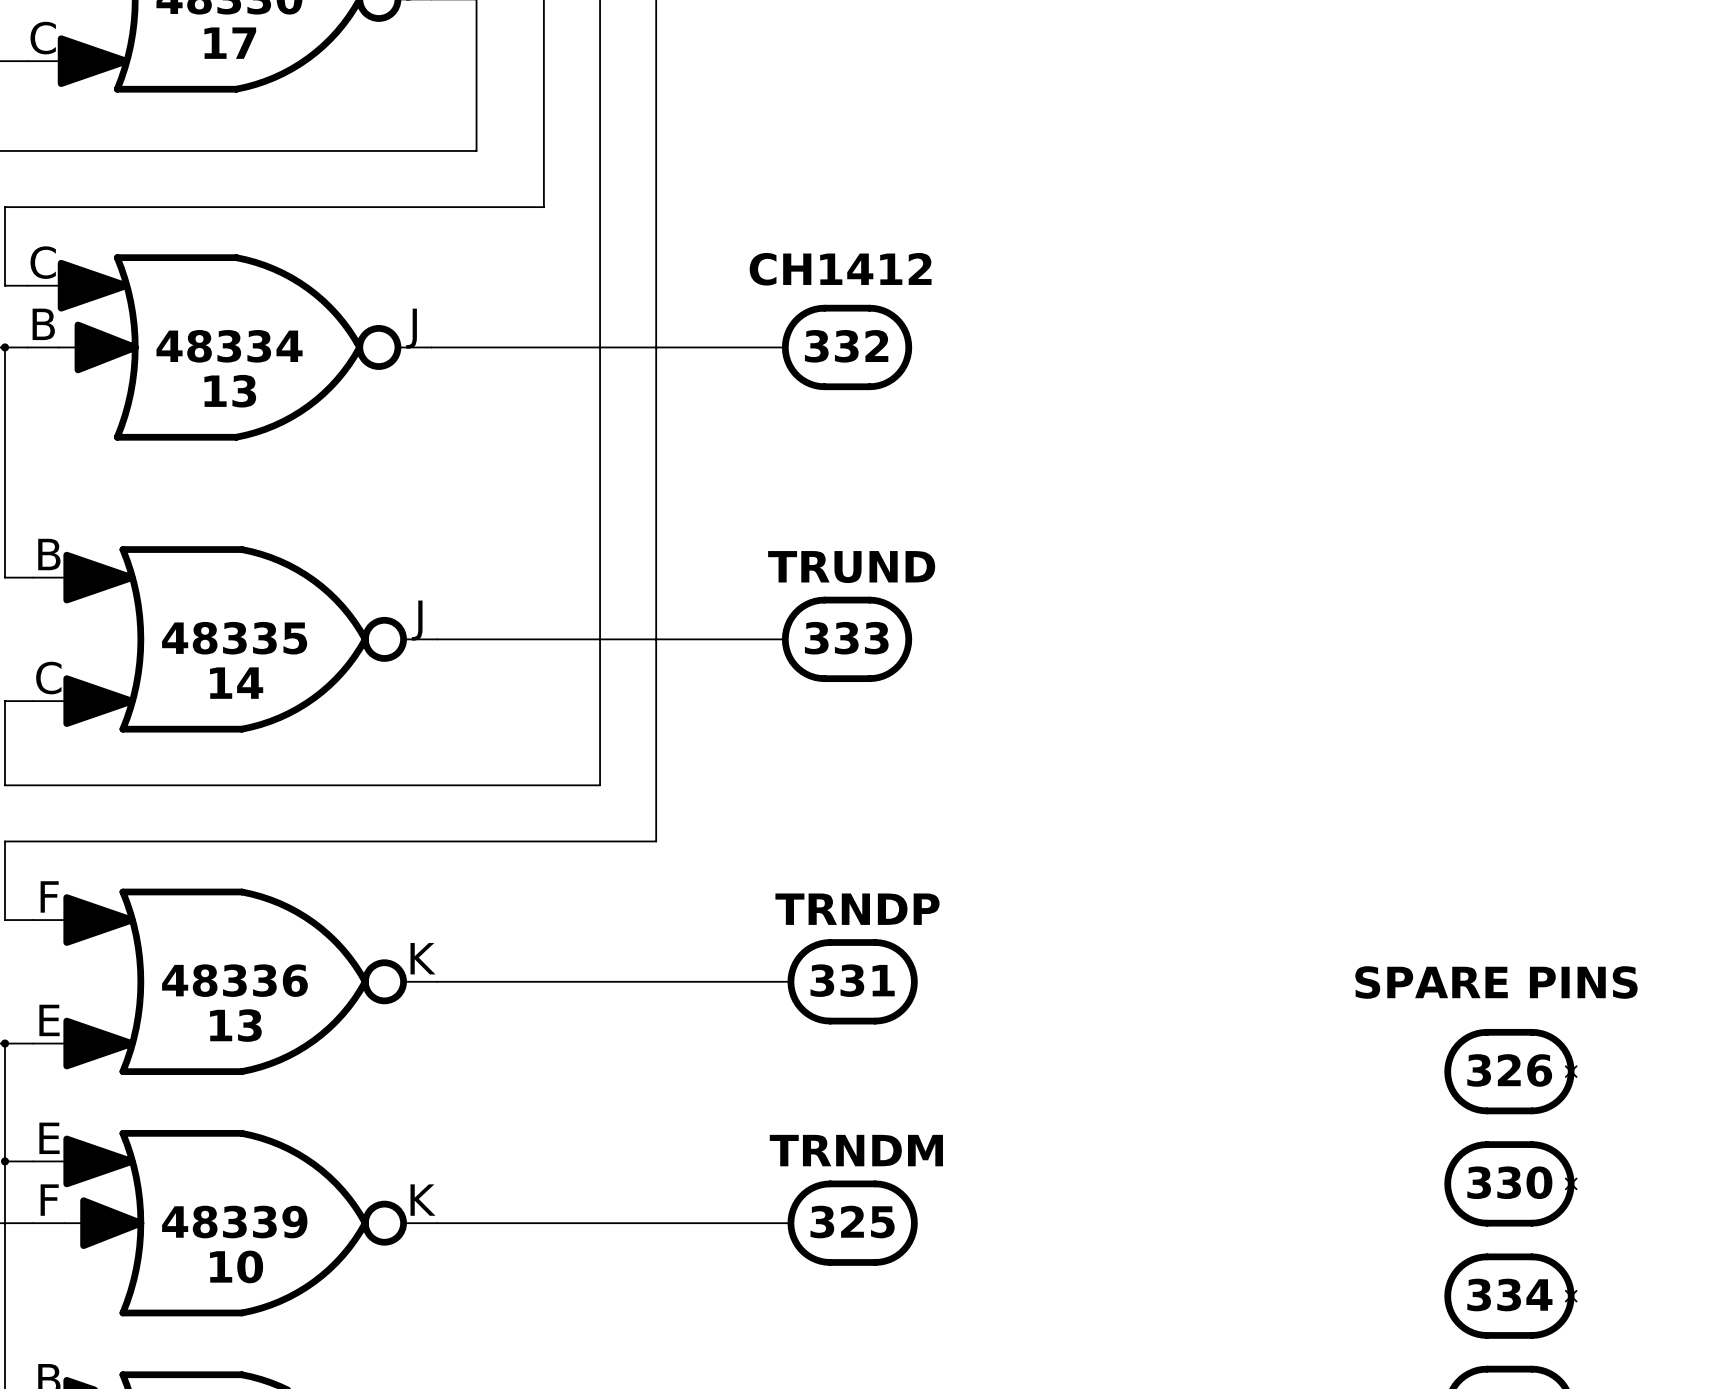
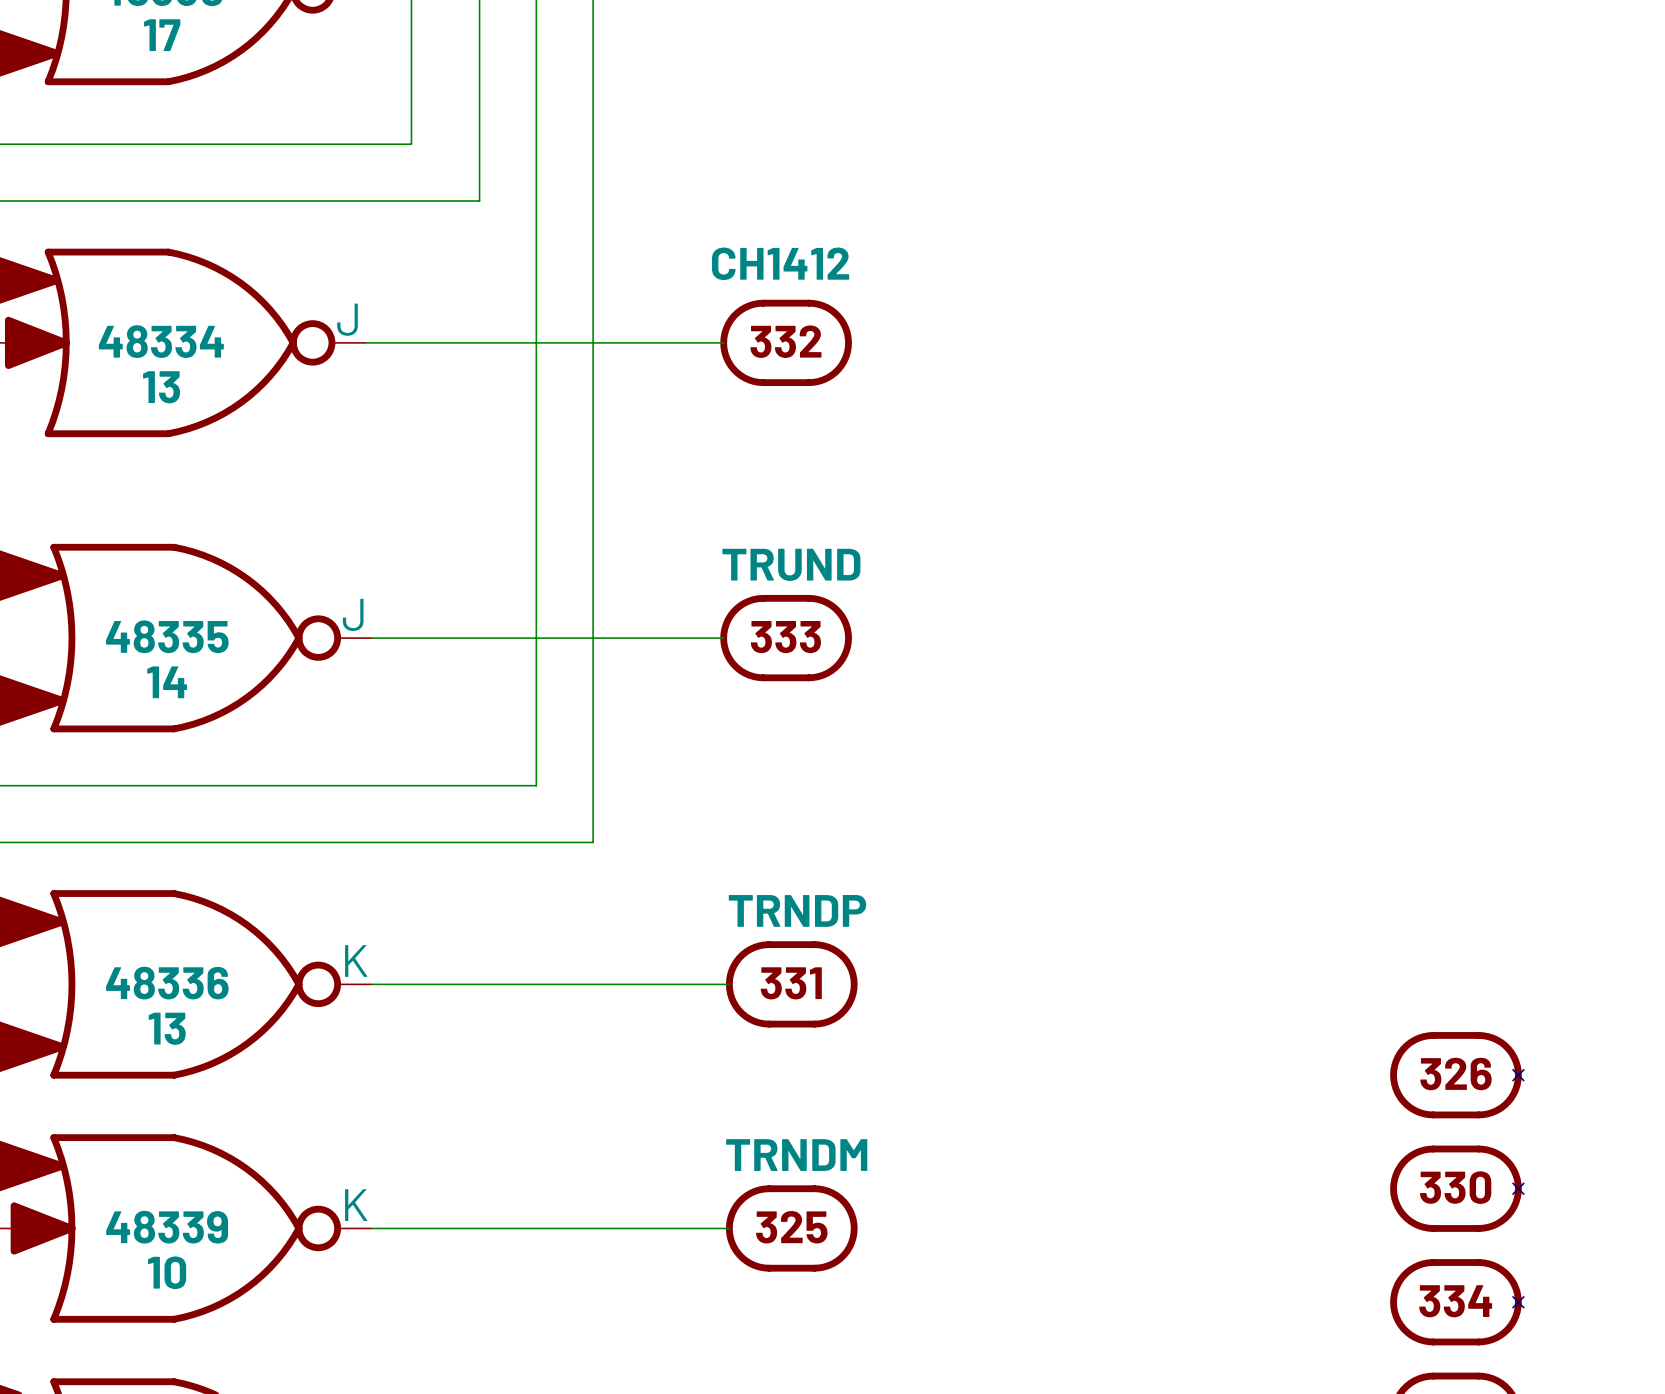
text: SPARE PINS (1496, 982) -> none

